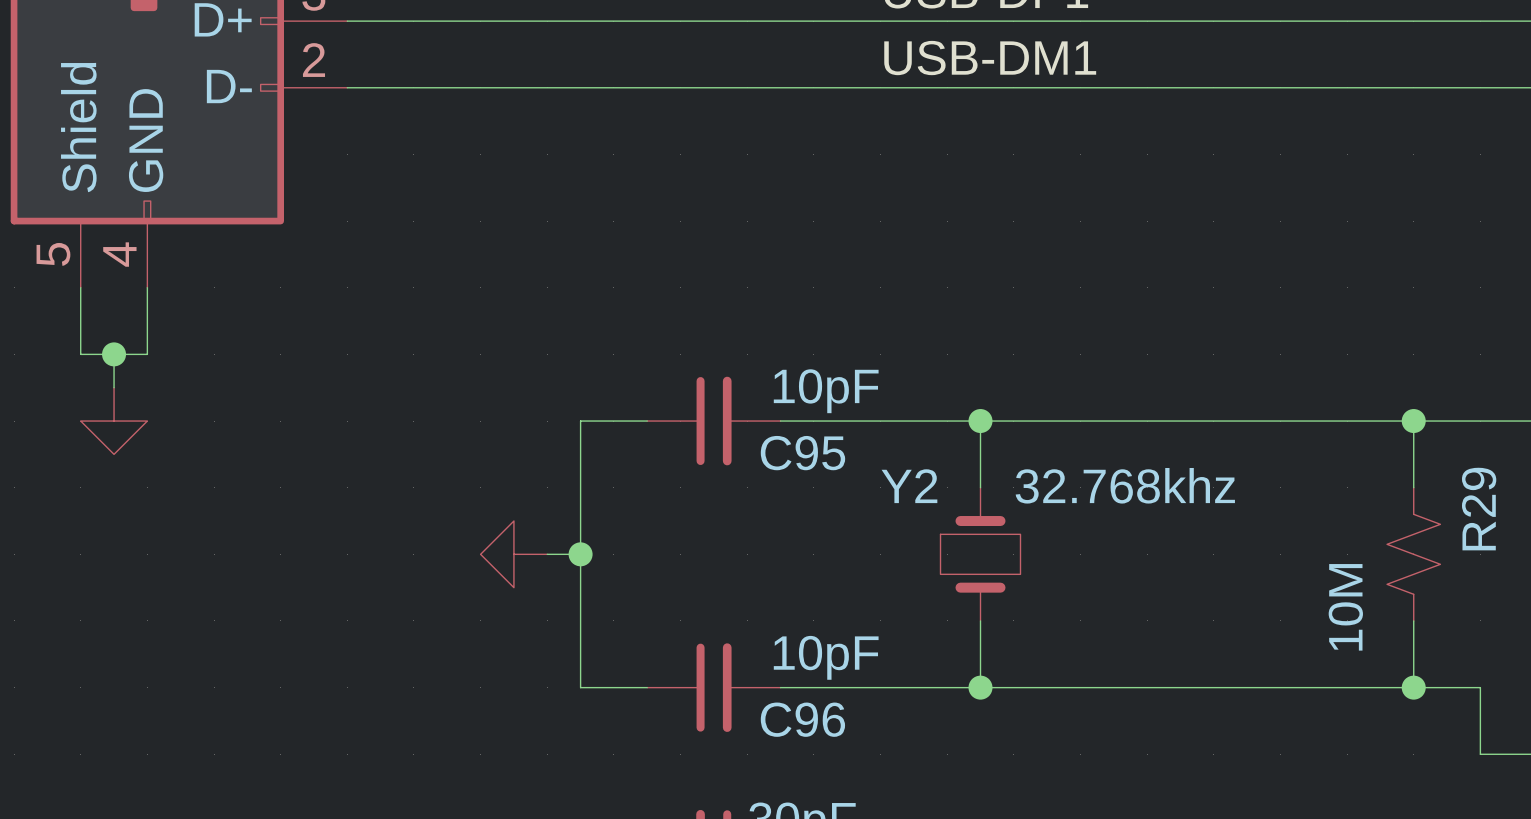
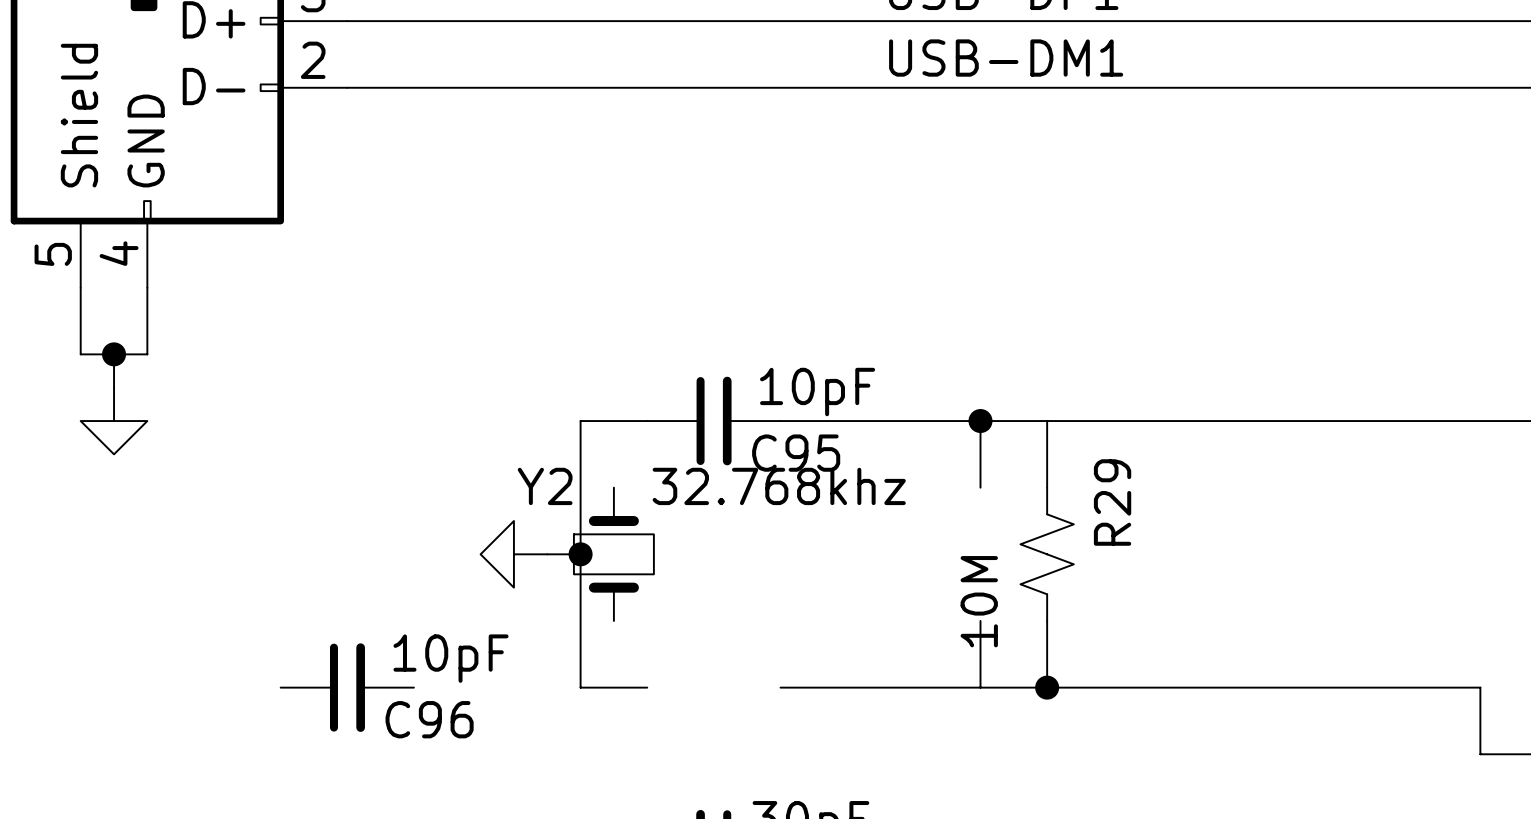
wire: (1413, 421) (1413, 487) -> (1047, 421) (1047, 487)
junction: (1413, 421) -> none
Y2 position: (980, 554) -> (613, 554)
R29 position: (1413, 554) -> (1047, 554)
wire: (1413, 620) (1413, 687) -> (1047, 620) (1047, 687)
C96 position: (713, 687) -> (347, 687)
junction position: (980, 687) -> (1047, 687)
junction: (1413, 687) -> none

